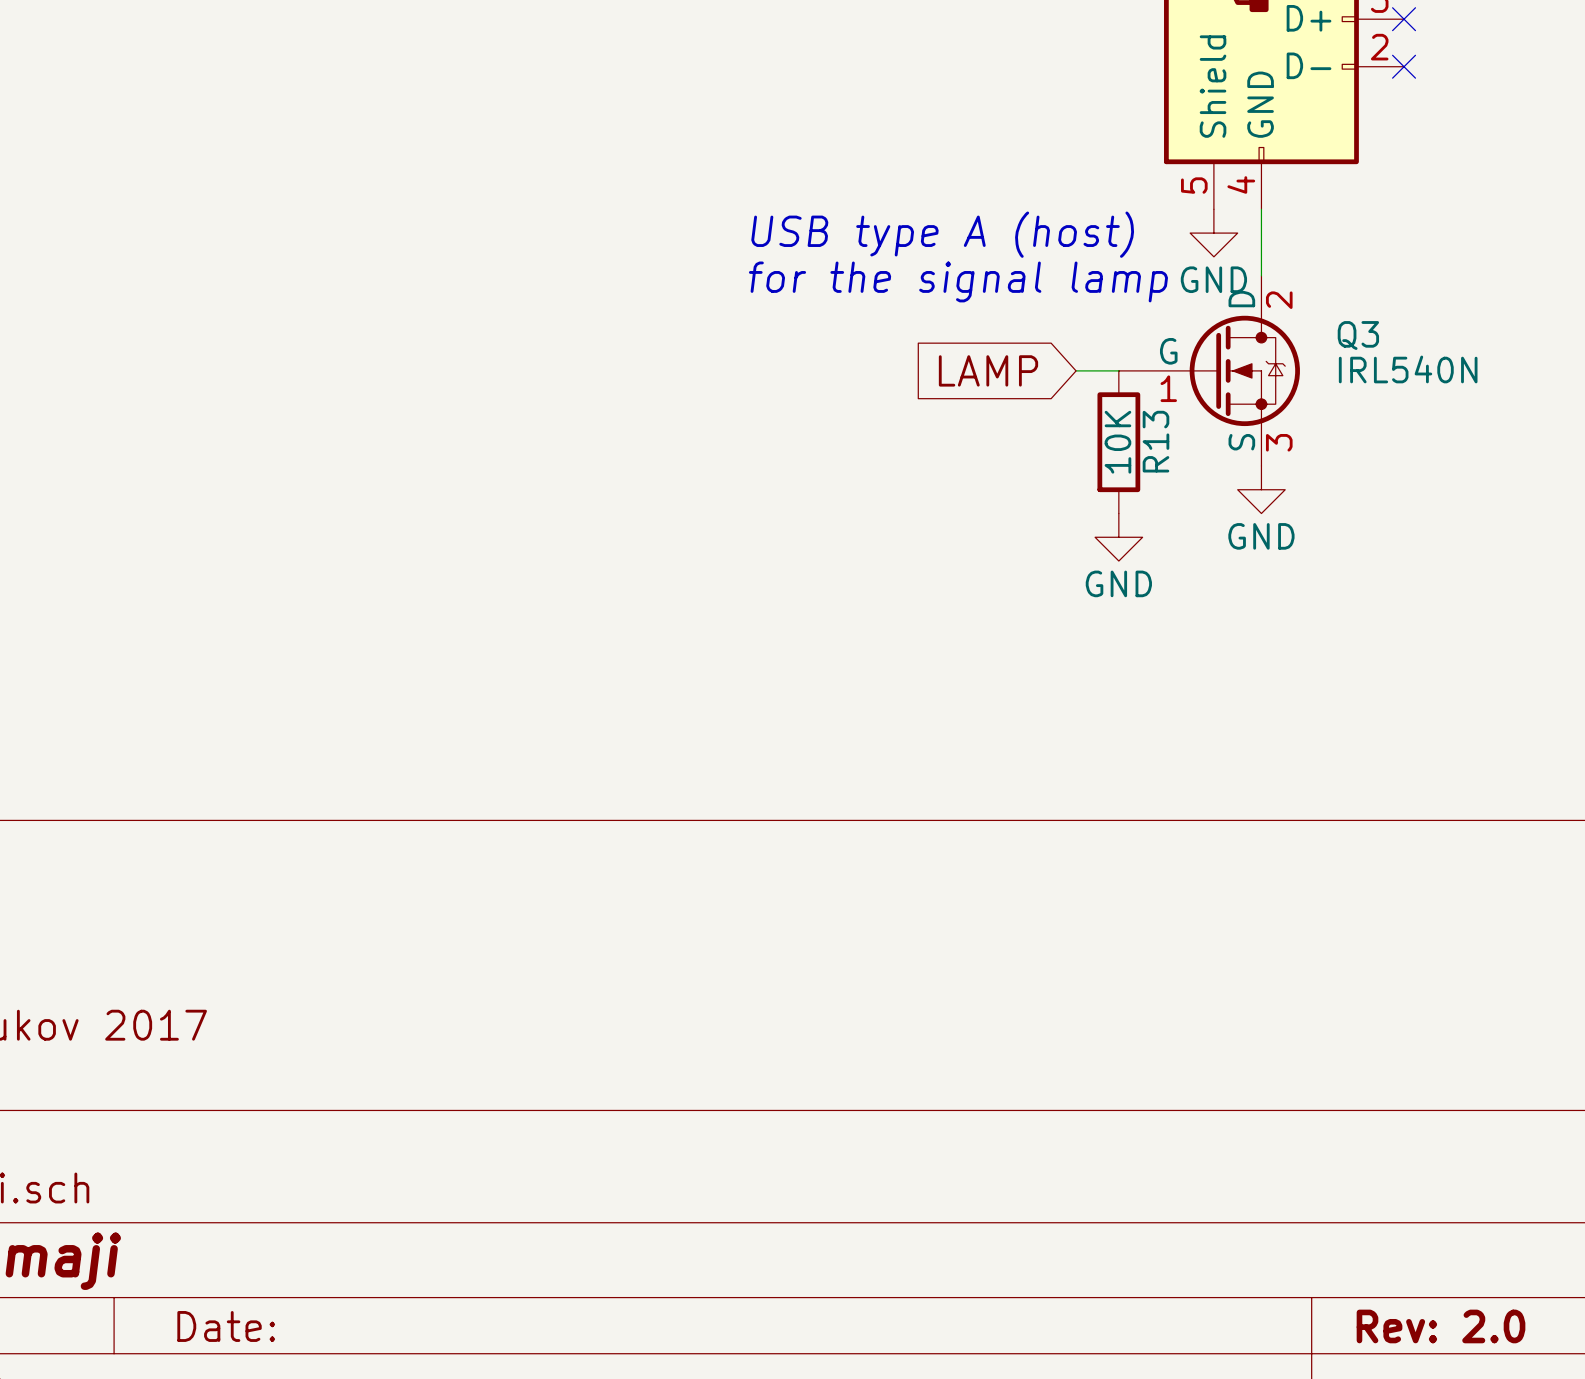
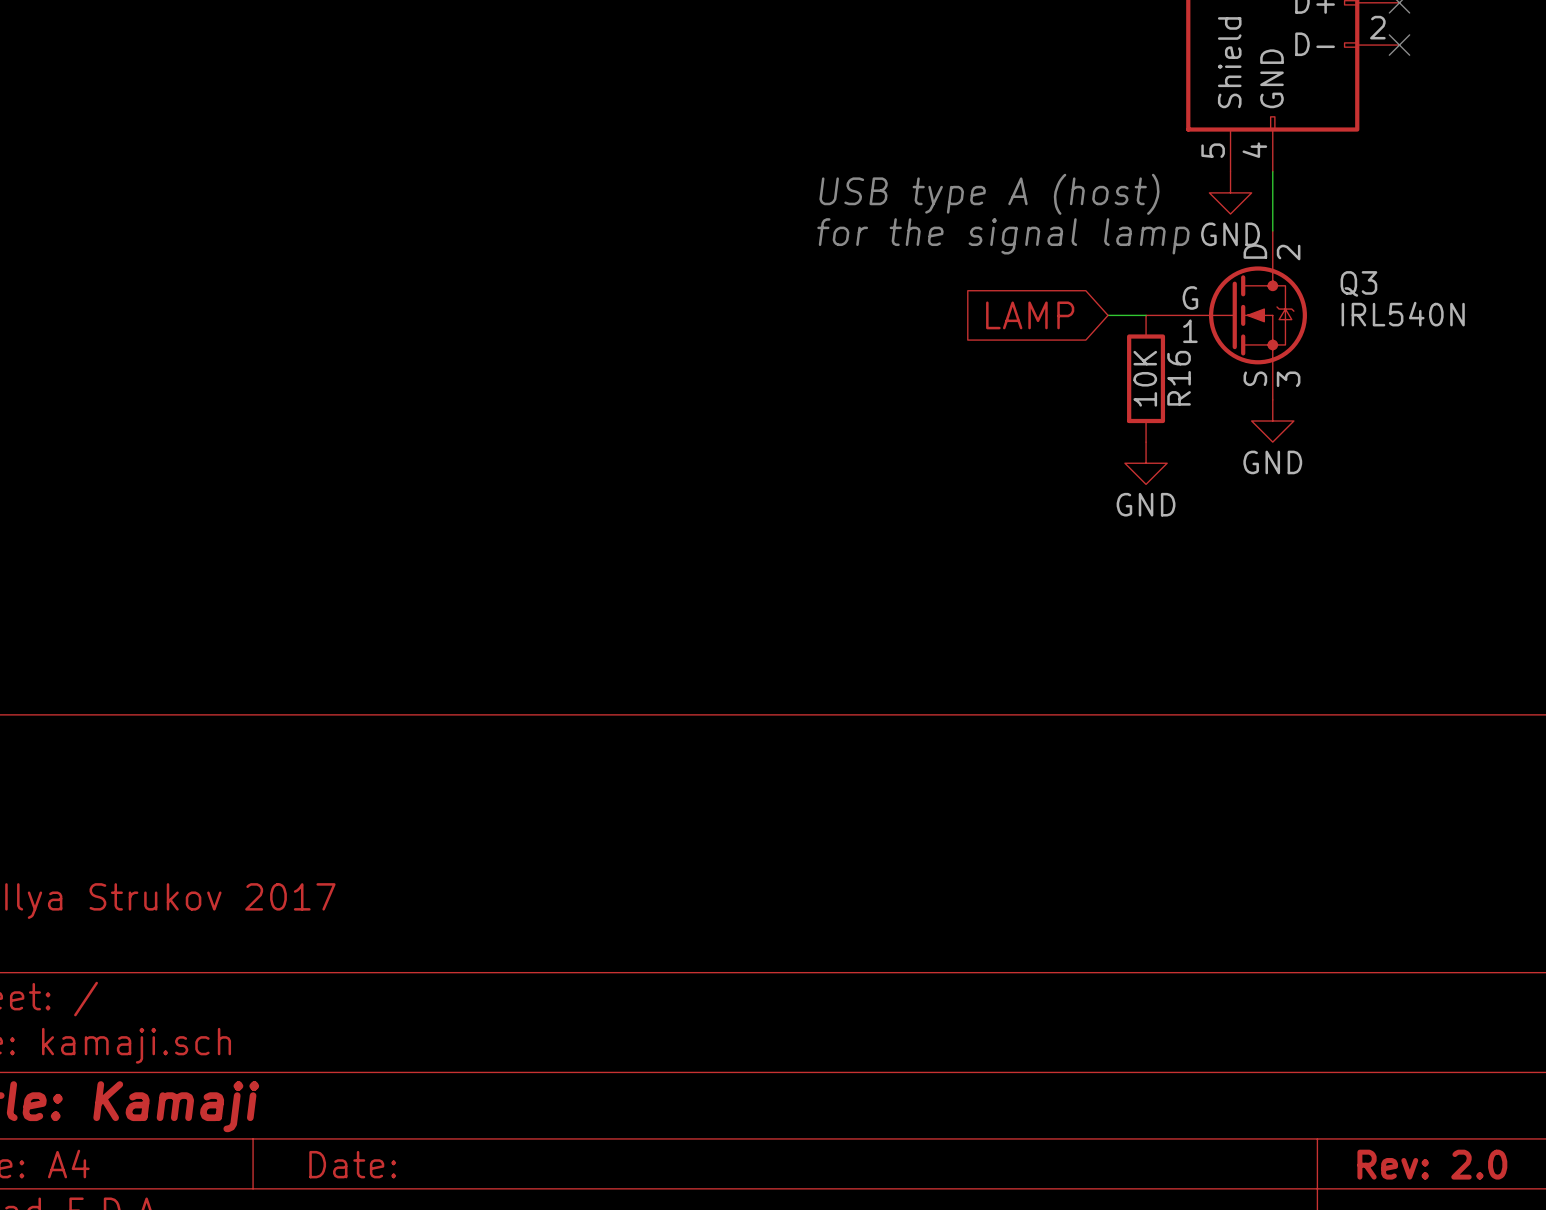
R13 name: R13 (1155, 441) -> R16 (1179, 378)

